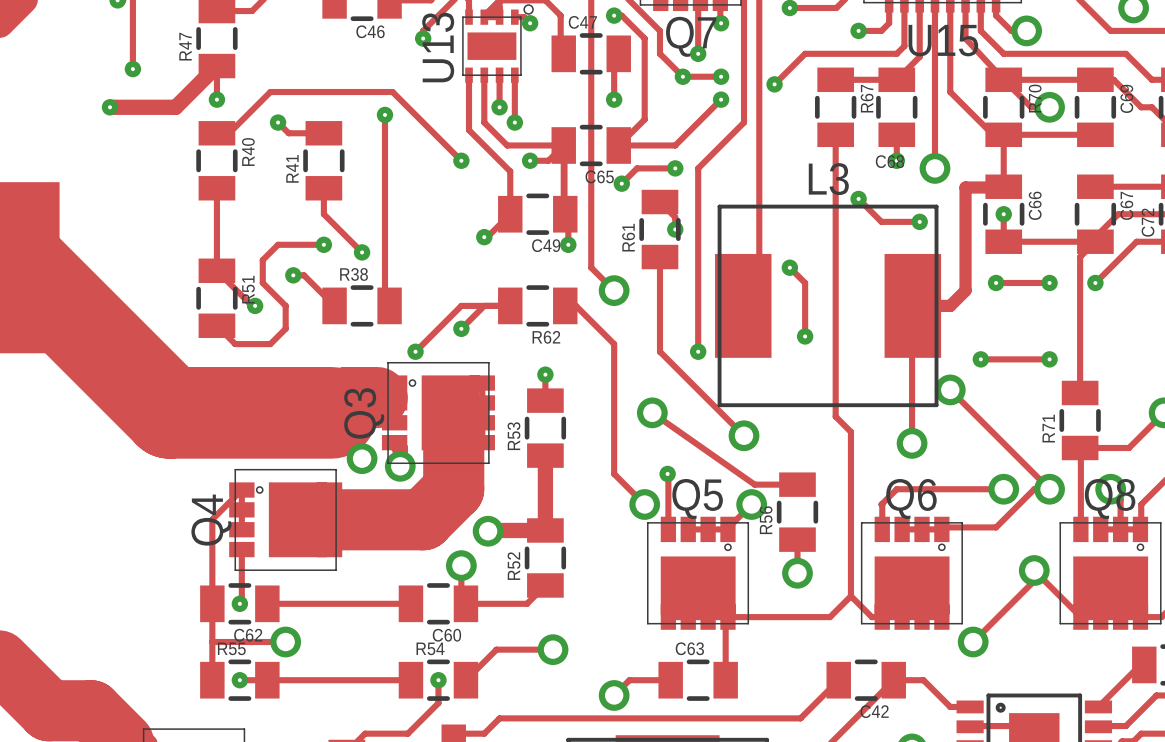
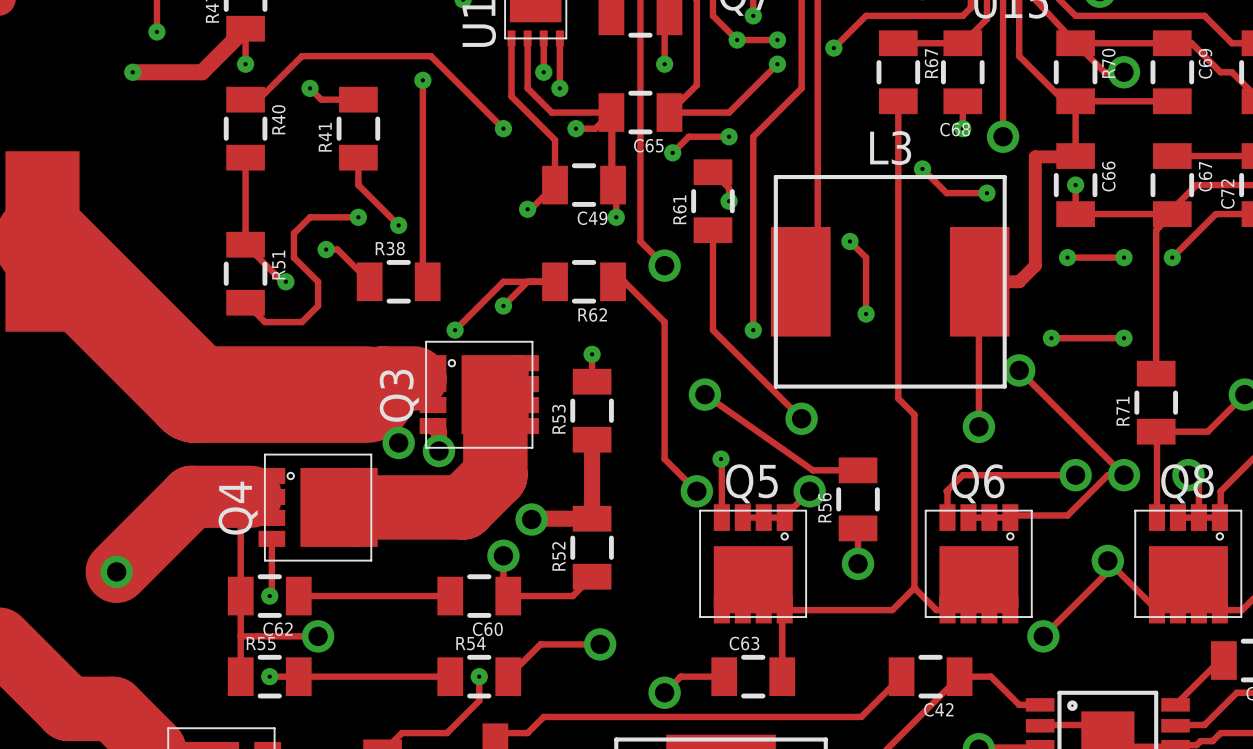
track: none -> (251, 496) (191, 496) (116, 571)
via: none -> (116, 571)

